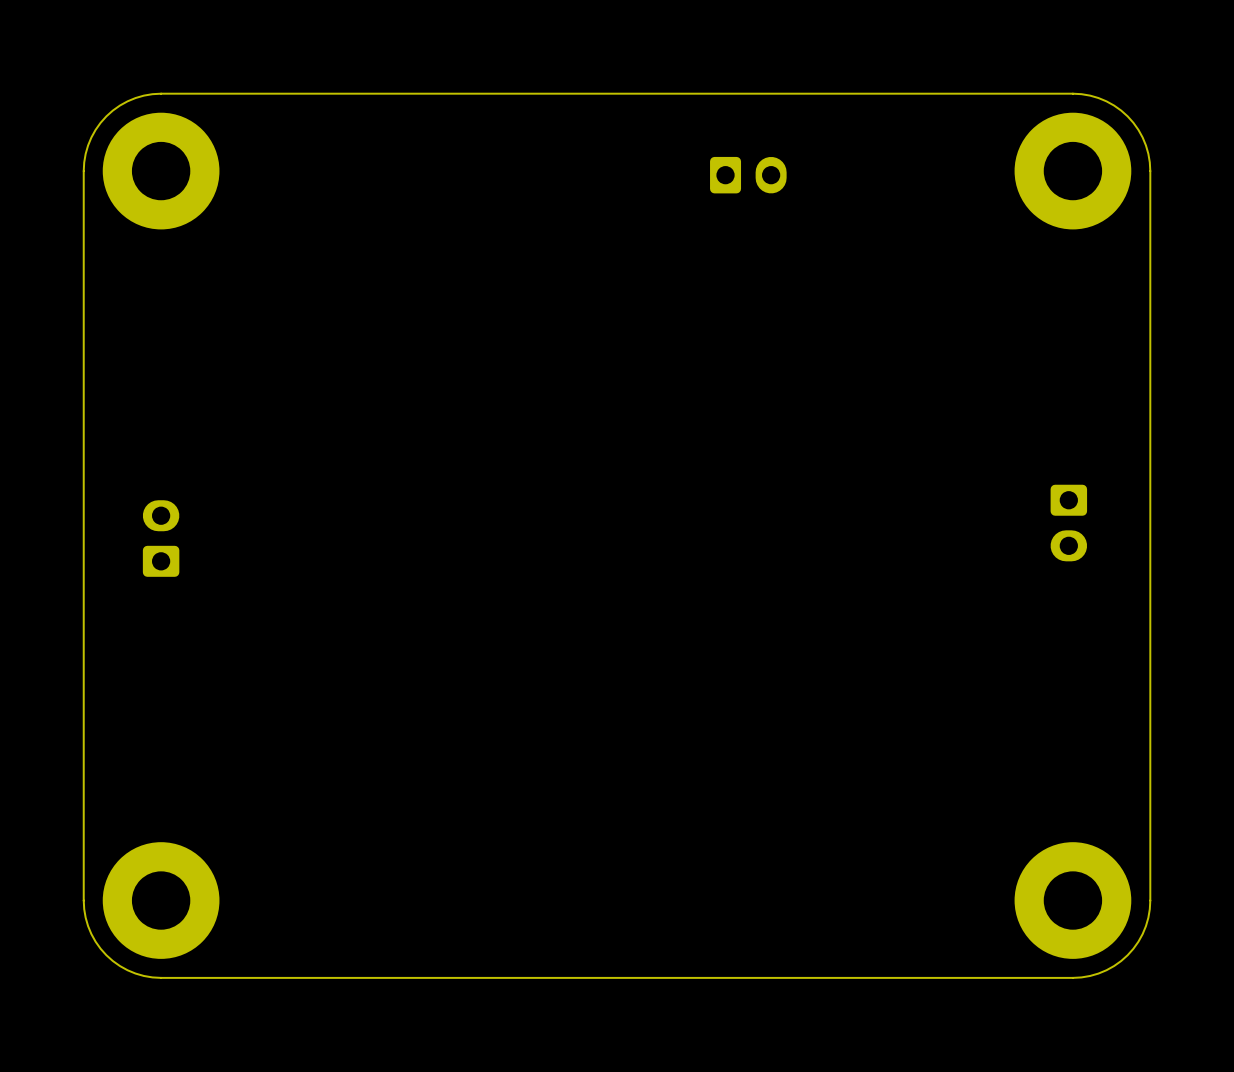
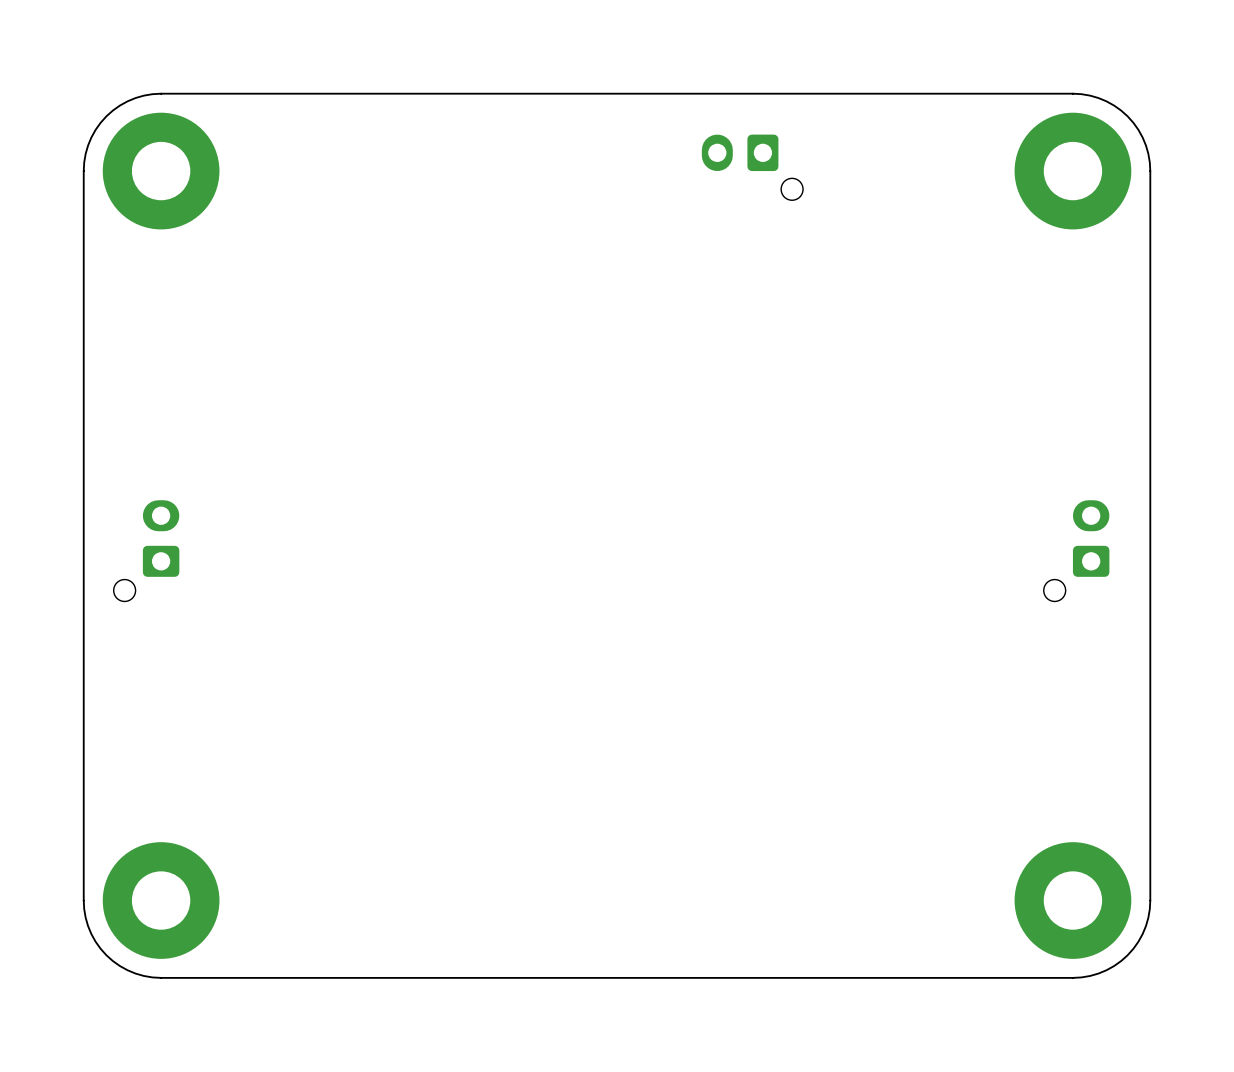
part footprint: [710, 156, 787, 194] -> [701, 134, 804, 201]
part: (1068, 523) -> none
part: none -> (146, 550)
part: none -> (1076, 550)

